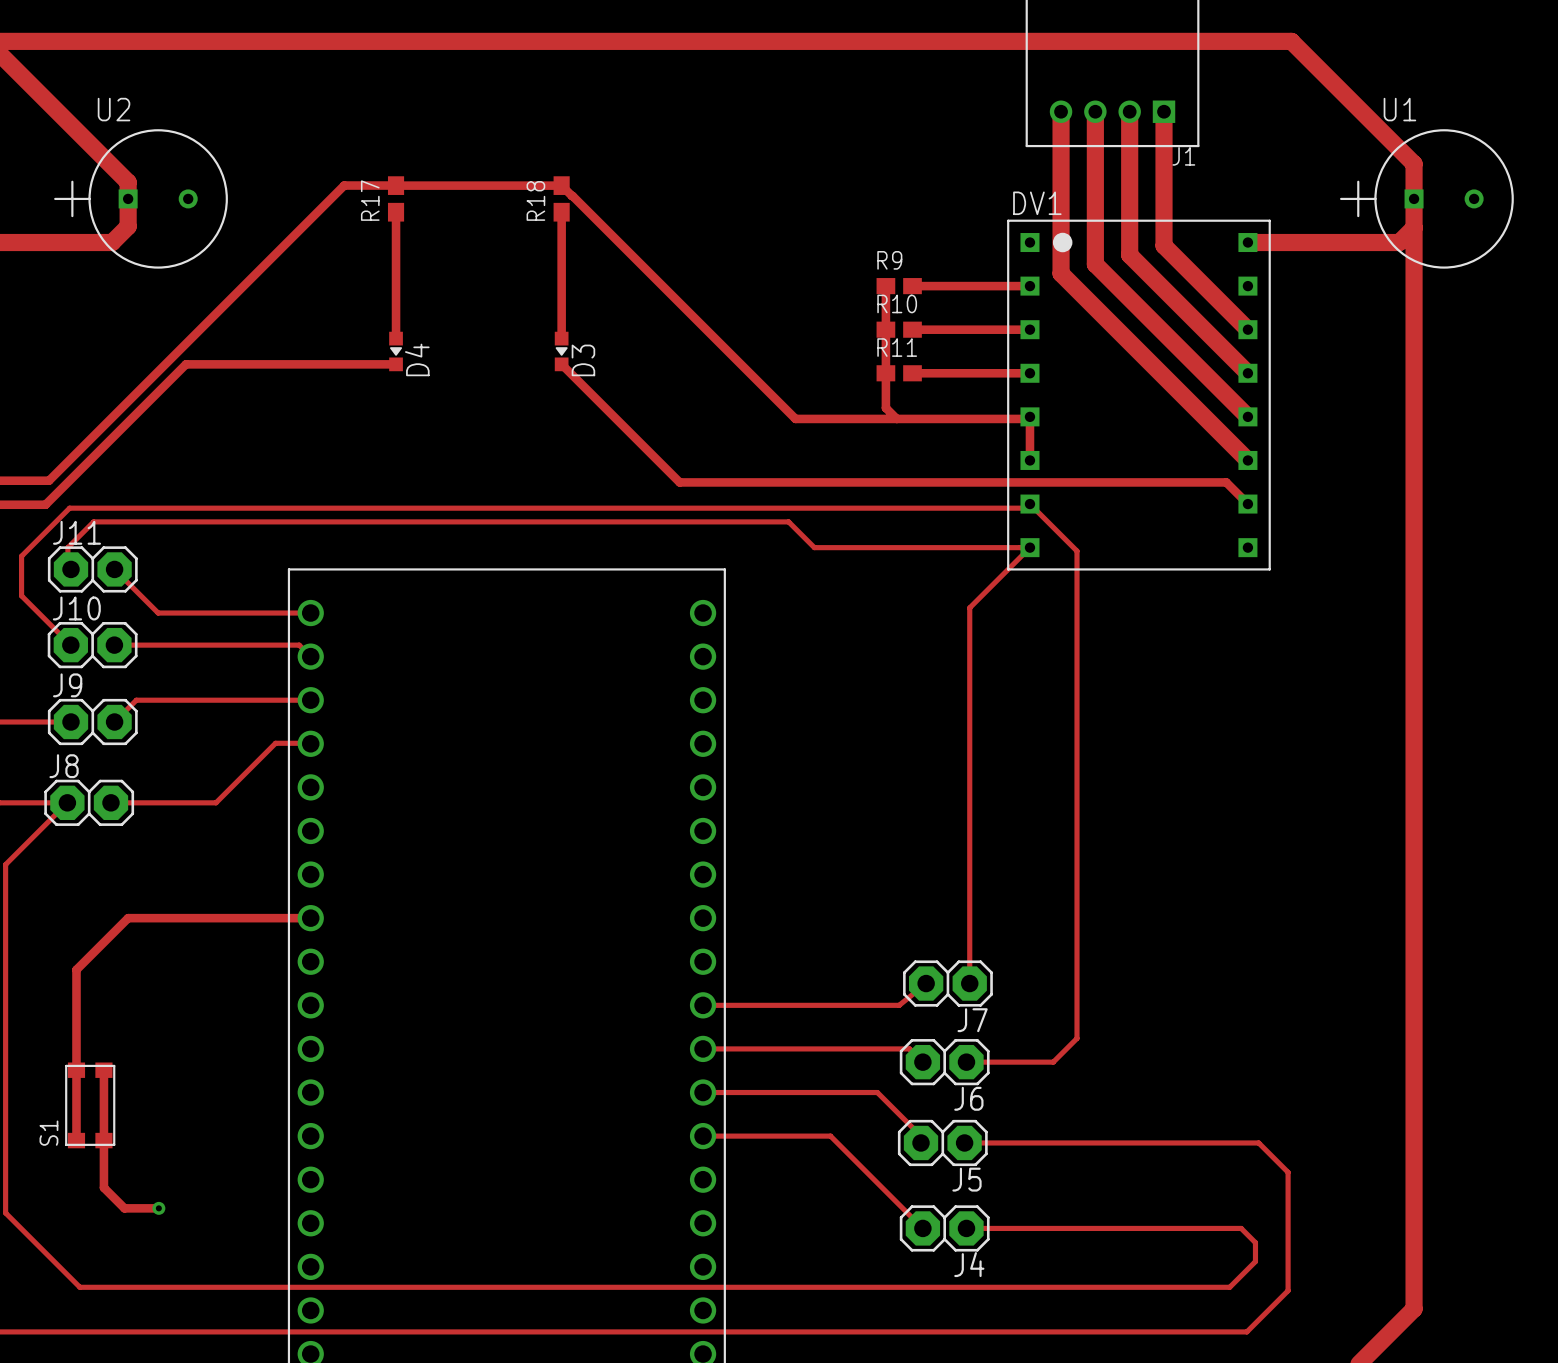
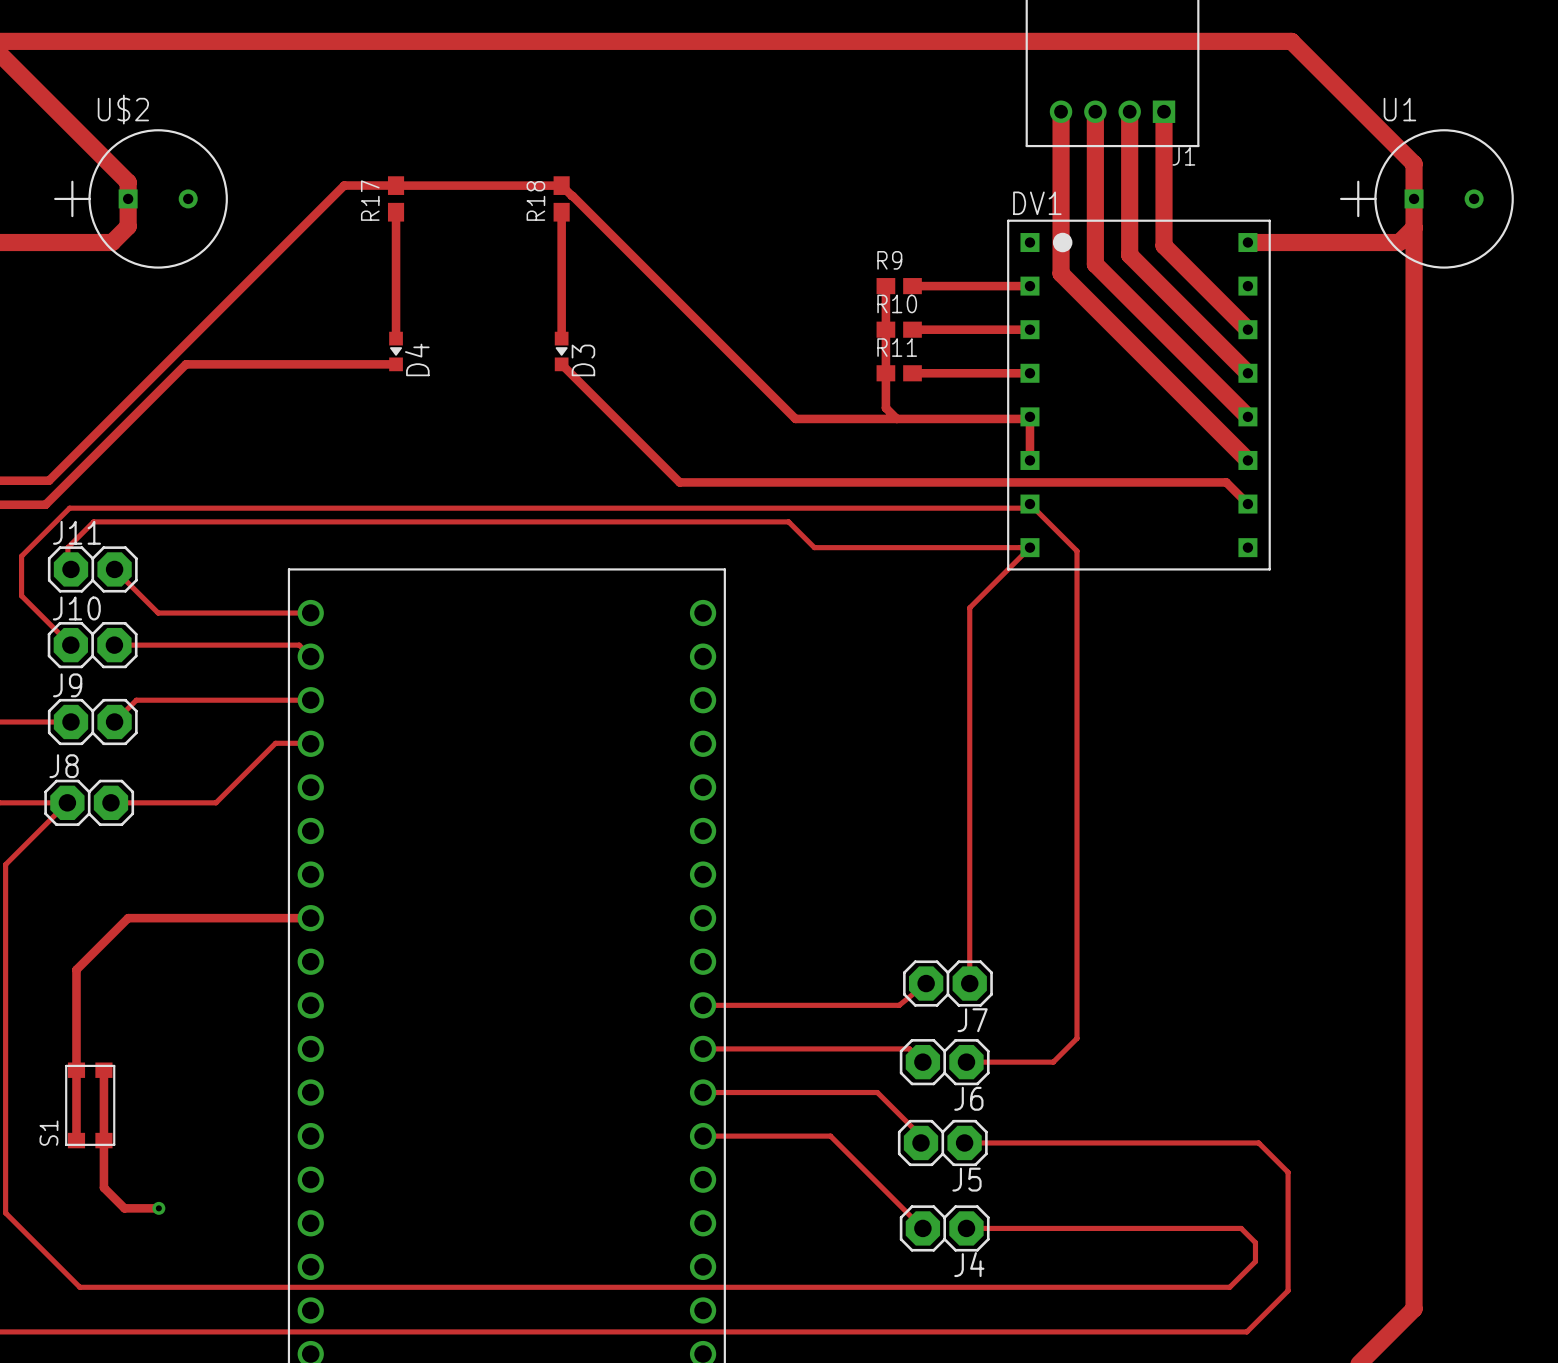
U2 name: U2 (114, 109) -> U$2 (123, 109)

